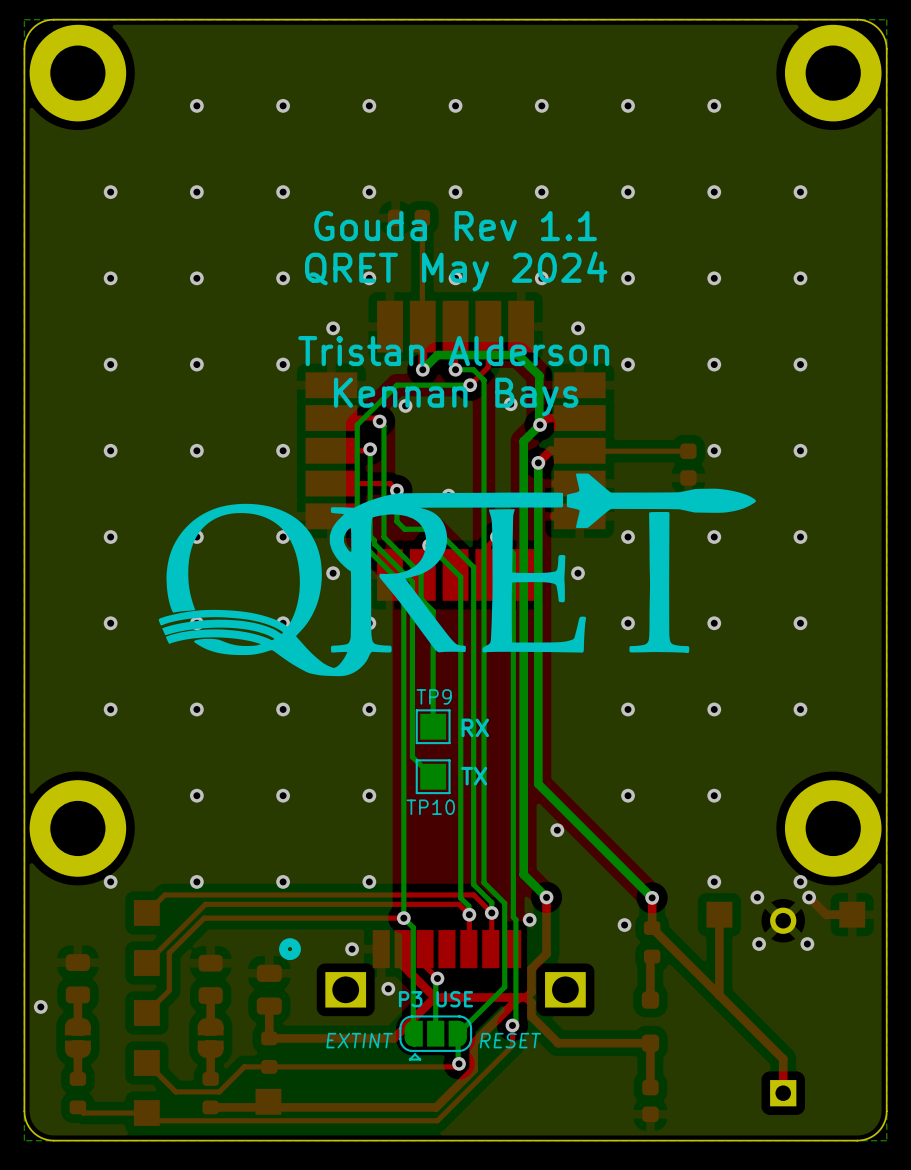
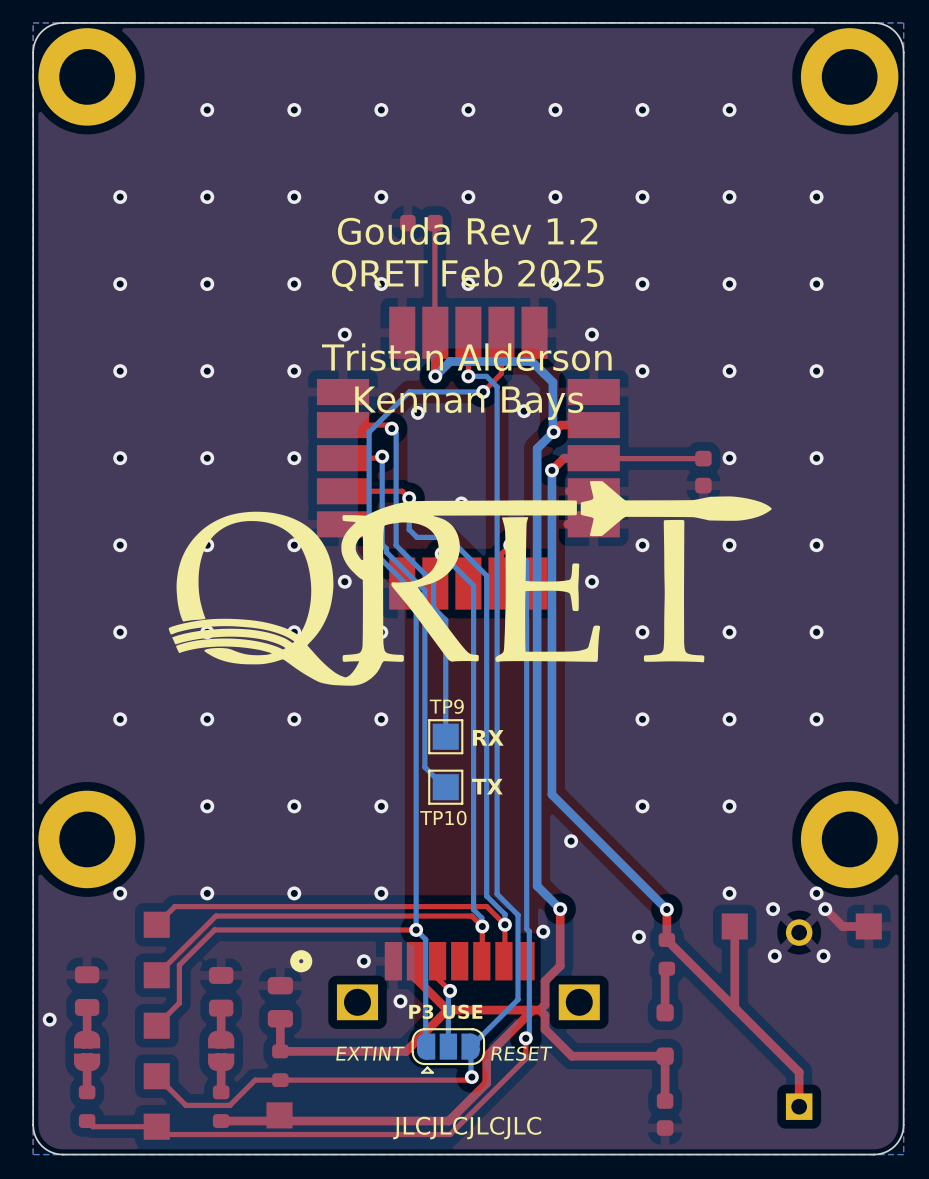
text: Gouda Rev 1.1 (455, 226) -> Gouda Rev 1.2 (467, 231)
text: QRET May 2024 (456, 271) -> QRET Feb 2025 (467, 275)
text: none -> JLCJLCJLCJLC (467, 1128)

